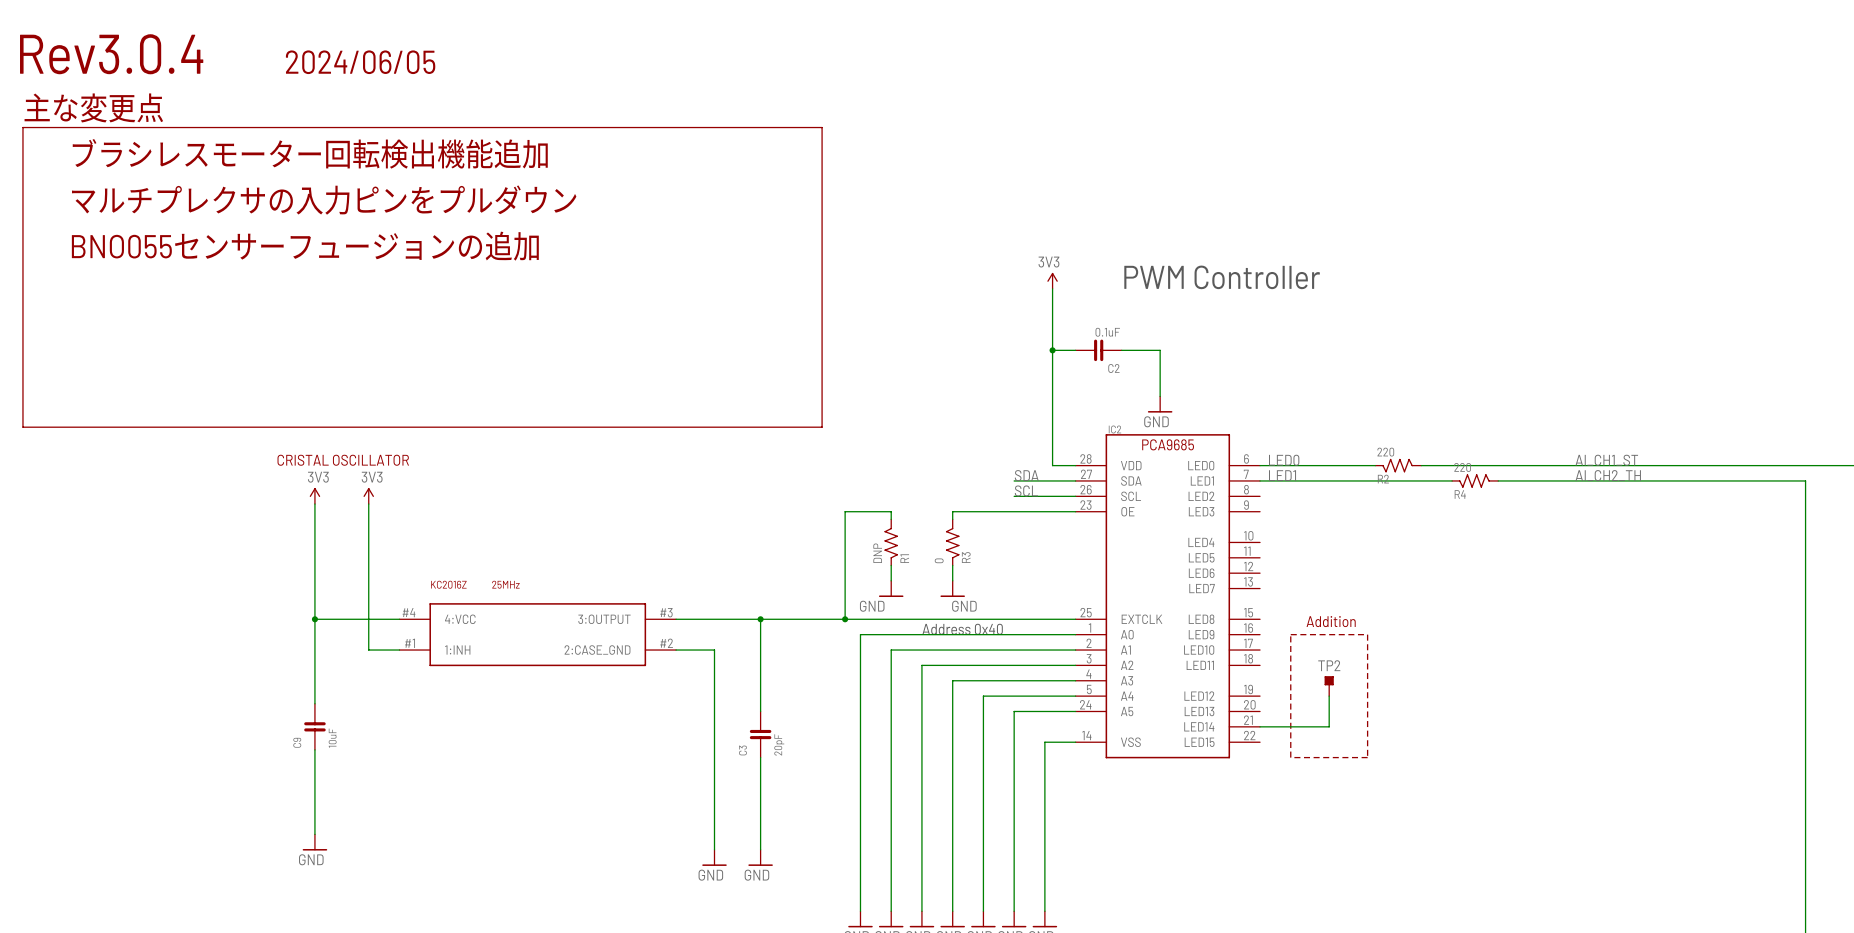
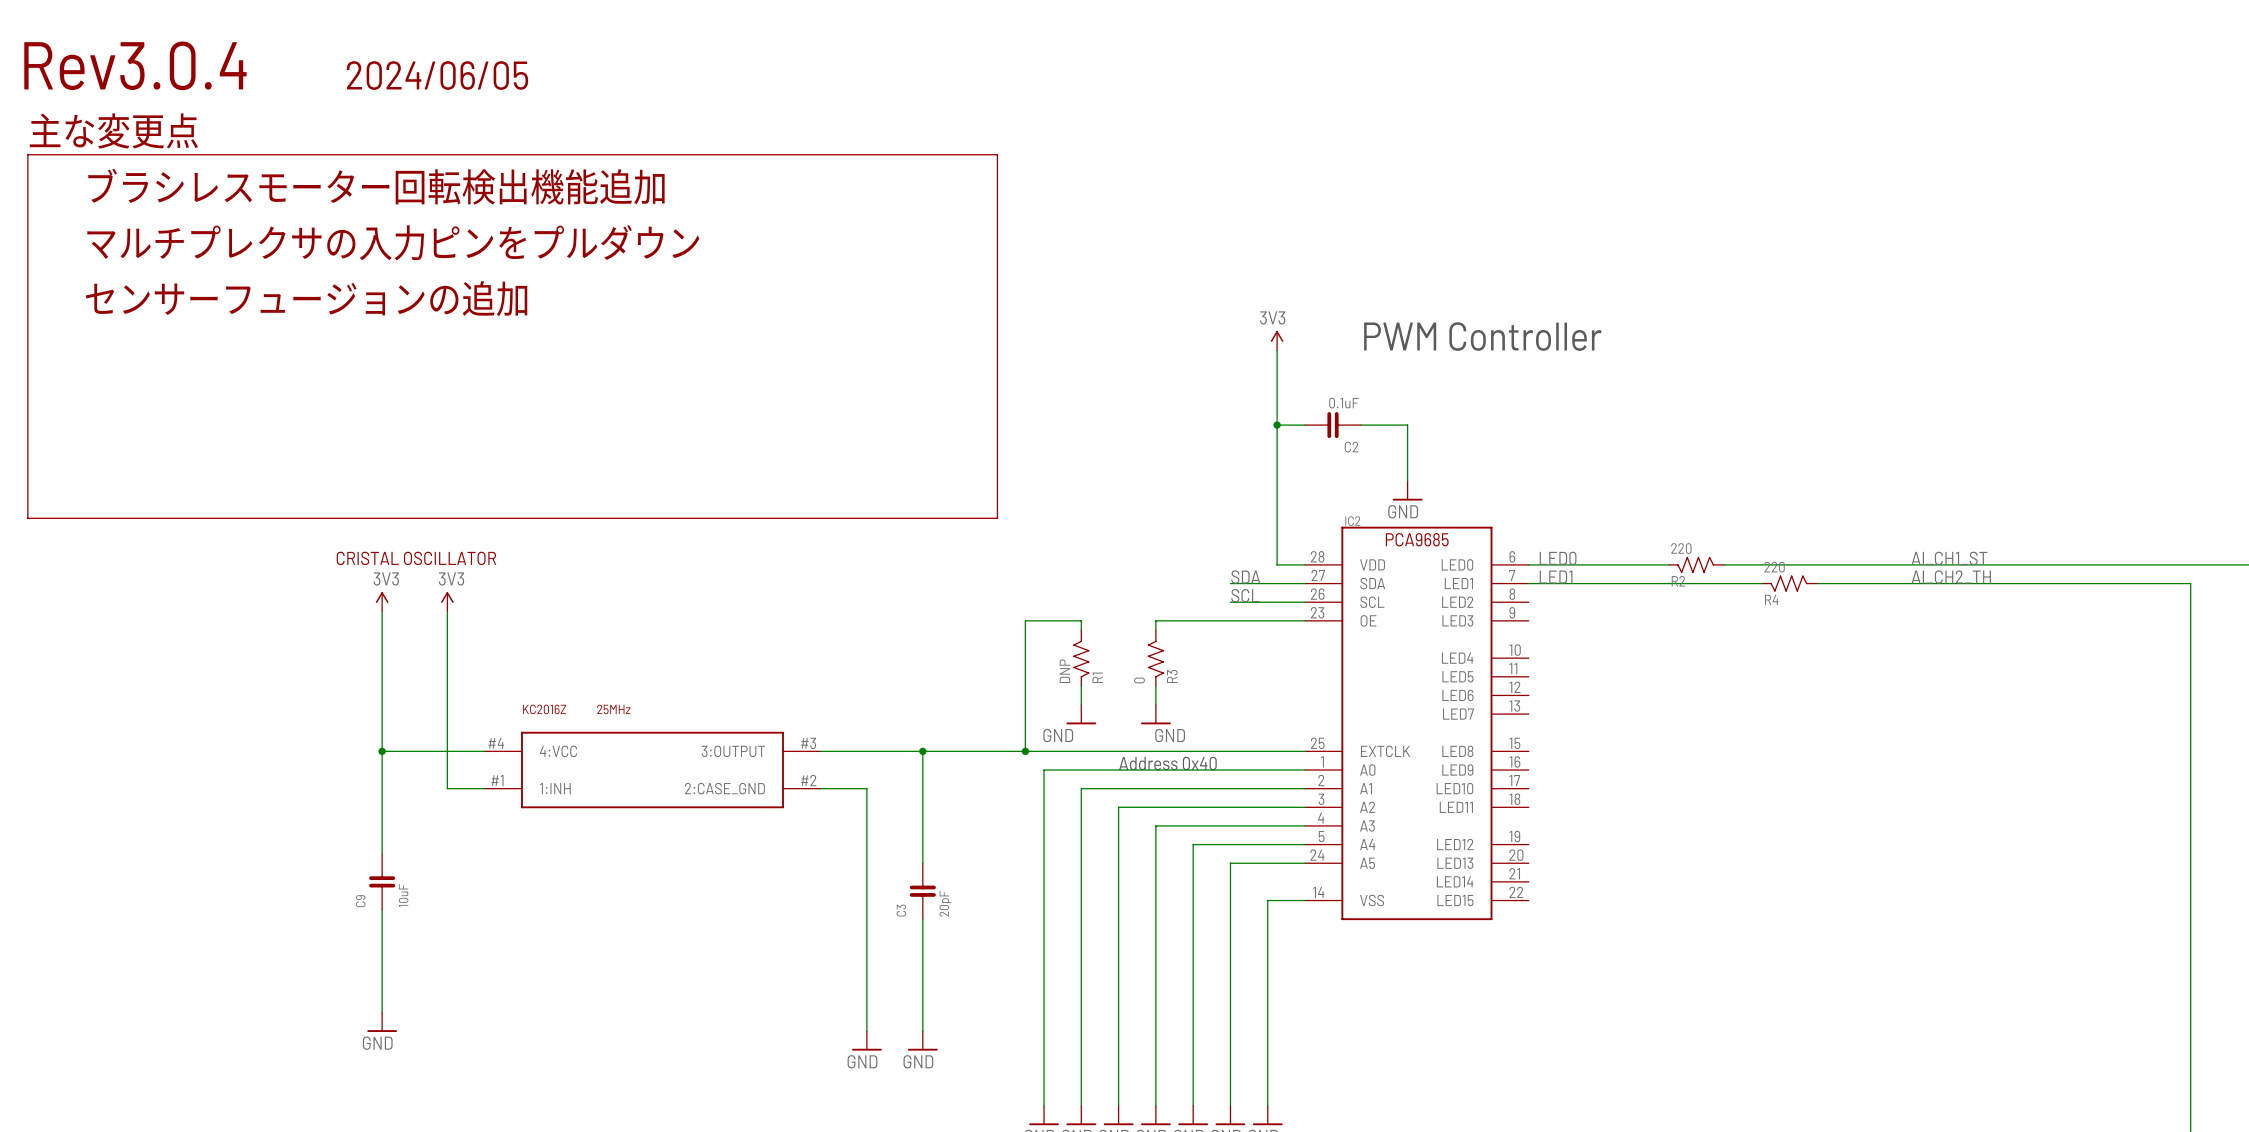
text: BNO055センサーフュージョンの追加 (305, 246) -> センサーフュージョンの追加 (306, 298)
text: Addition (1331, 621) -> none
line: (1290, 634) (1367, 634) (1367, 757) (1290, 757) (1290, 634) -> none
TP2: (1329, 686) -> none
wire: (1329, 696) (1329, 726) (1260, 726) -> none

